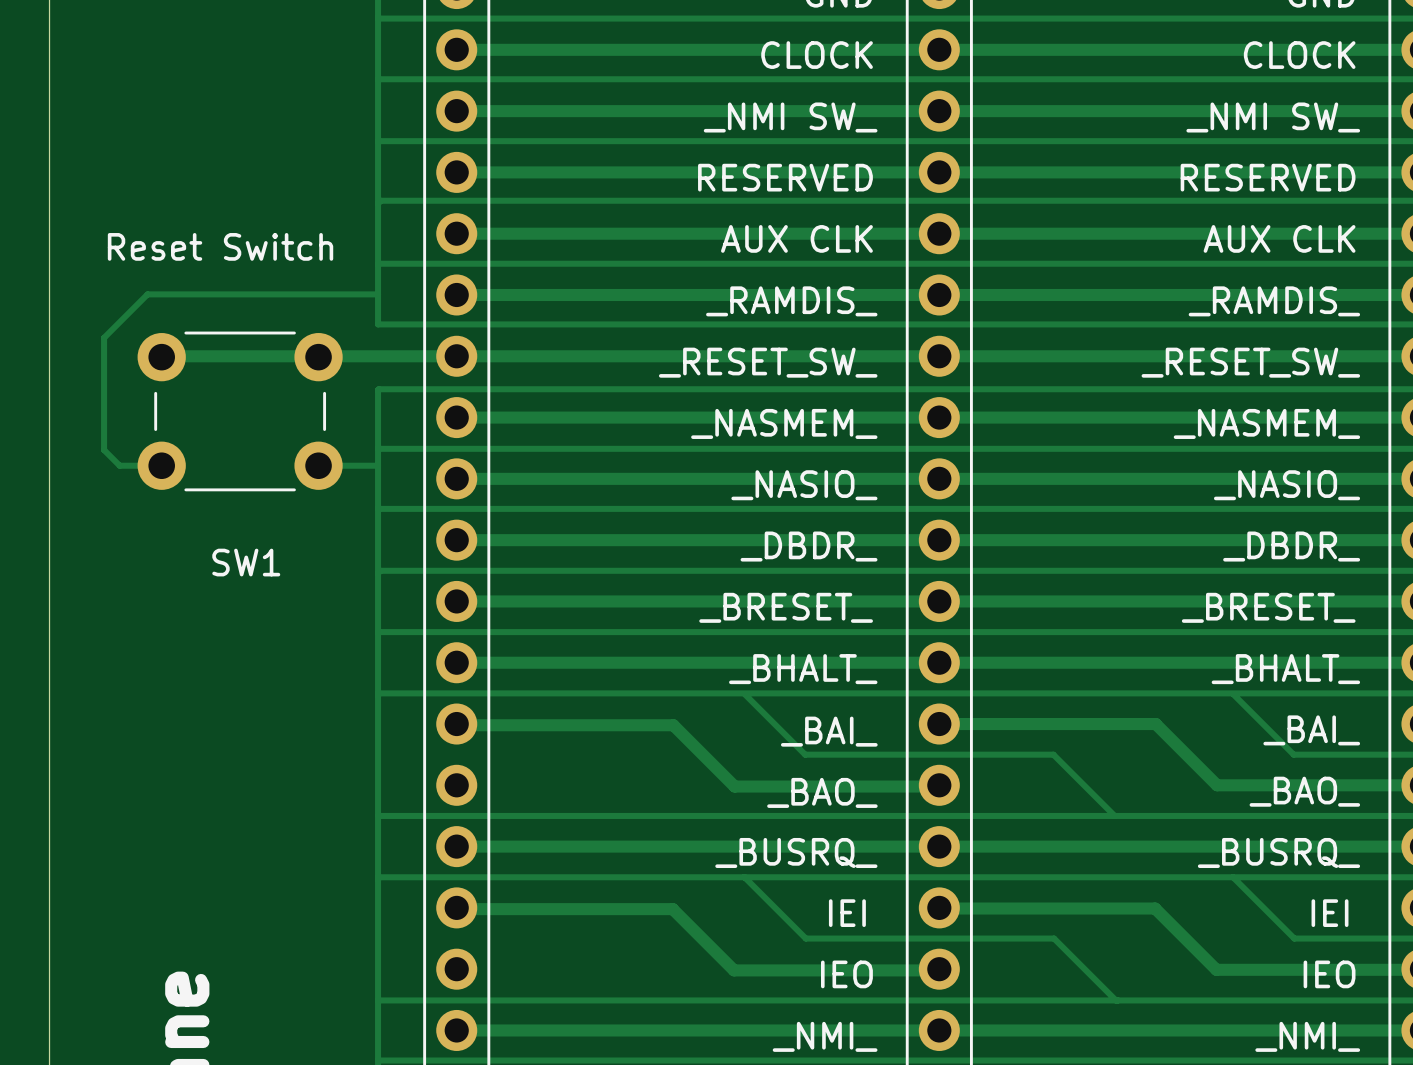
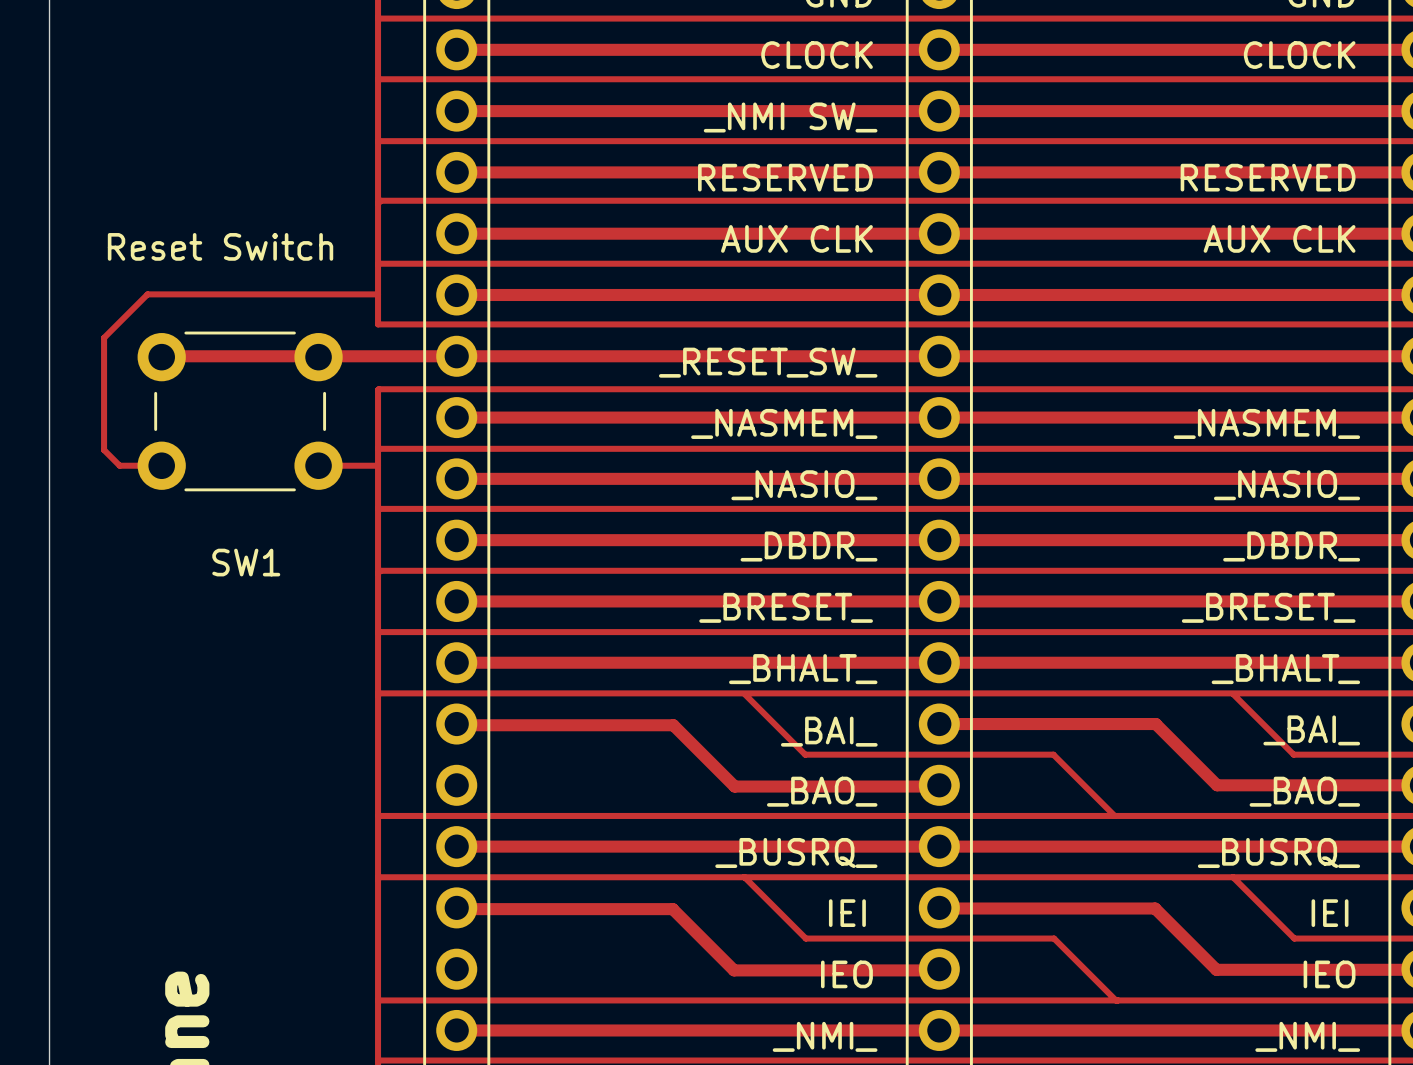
part text: _NMI SW_ (1273, 117) -> none
part text: _RAMDIS_ (791, 301) -> none
part text: _RAMDIS_ (1274, 301) -> none
part text: _RESET_SW_ (1250, 362) -> none
part text: none -> _BAO_ (822, 791)
text: _BAO_ (822, 792) -> none

